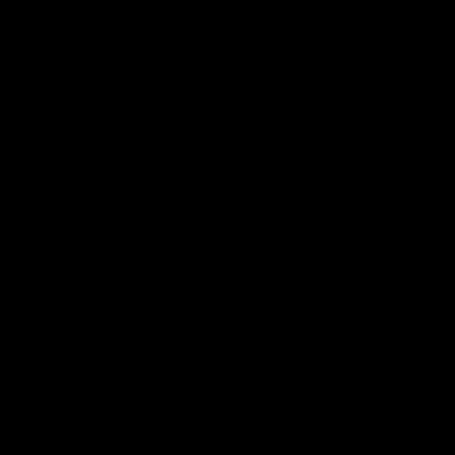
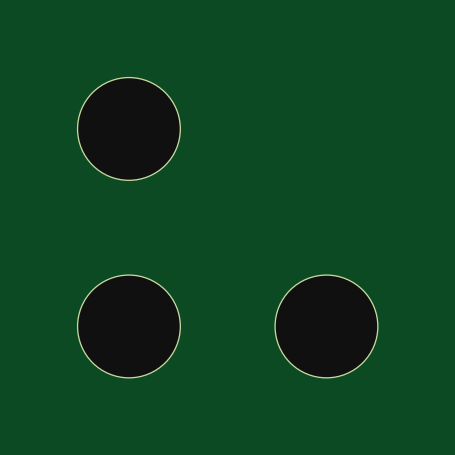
part: none -> (128, 128)
part: none -> (128, 326)
part: none -> (326, 326)

